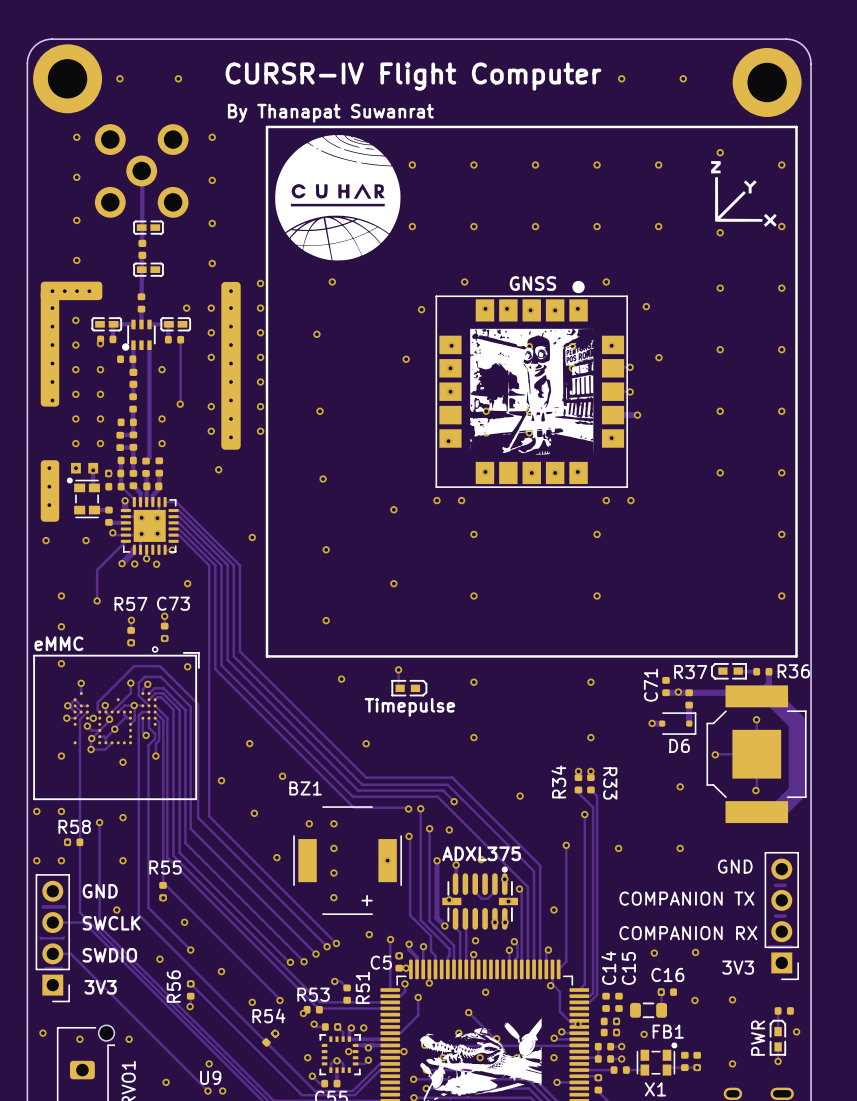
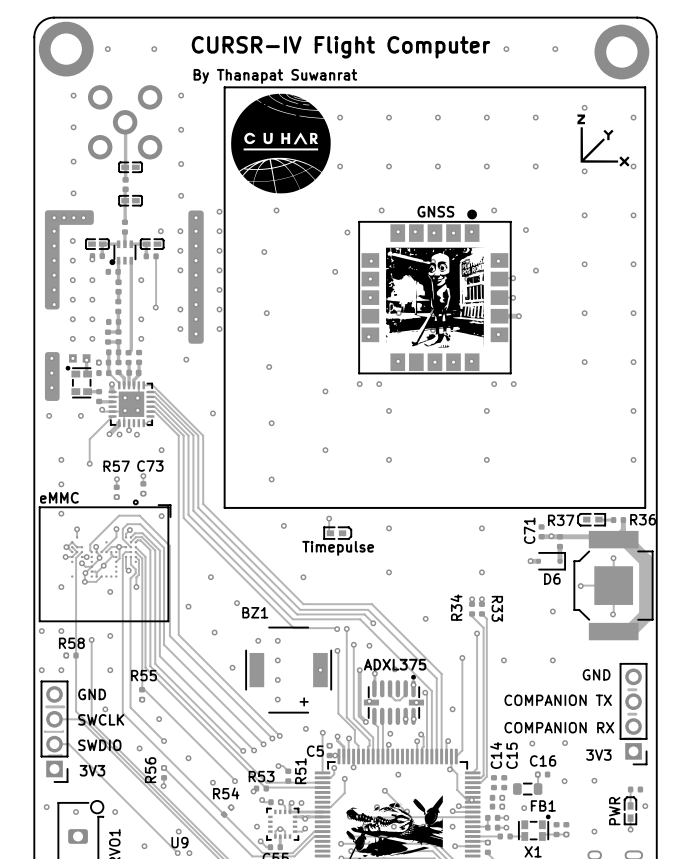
via: (348, 1051) -> none
via: (403, 1051) -> none

